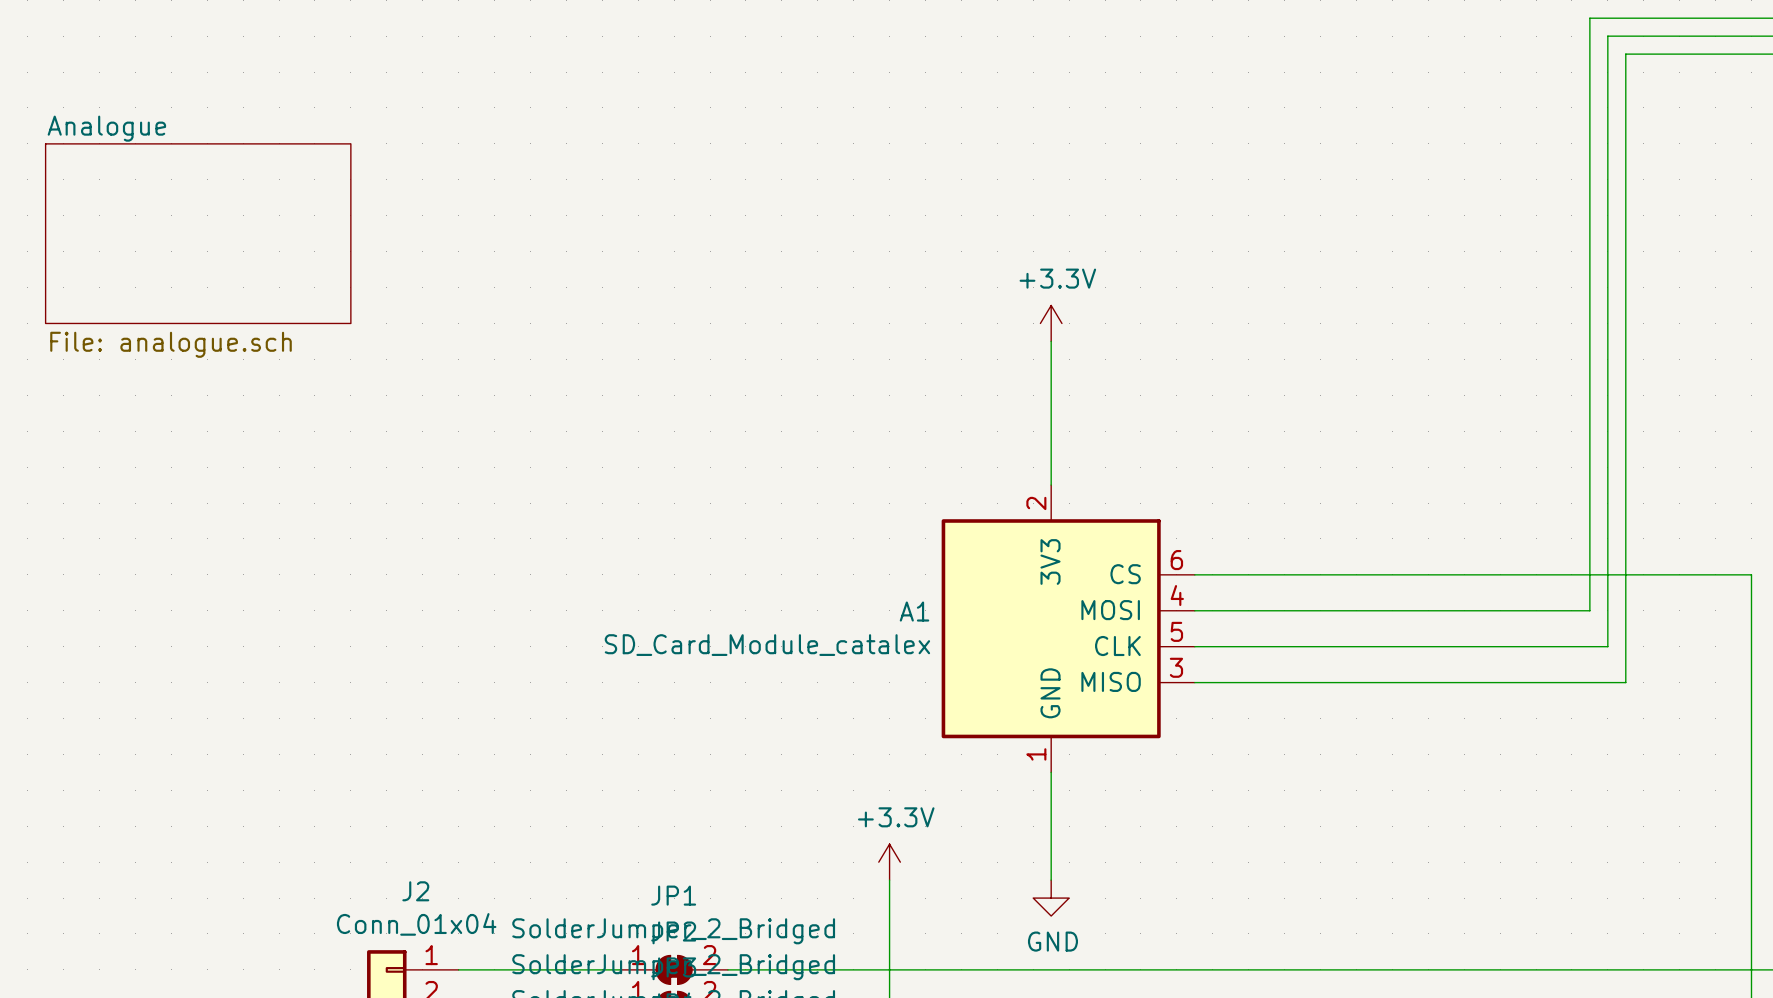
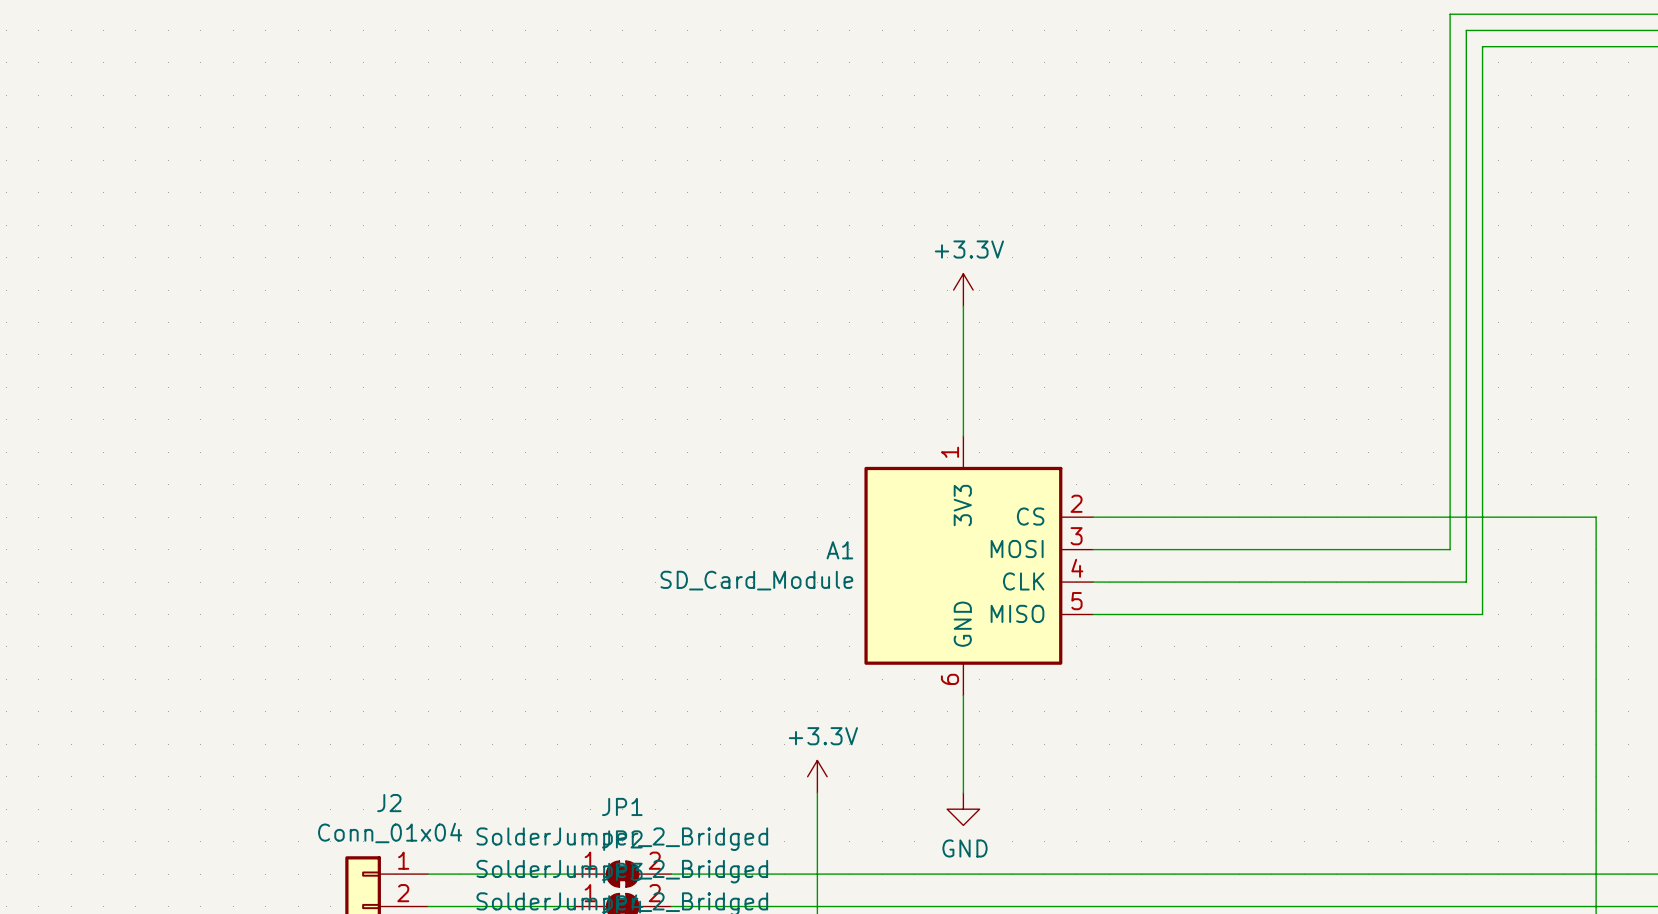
sheet Analogue: File: analogue.sch (198, 233) -> none
A1 pin number: 2 (1036, 503) -> 1 (950, 452)
A1 pin number: 6 (1176, 560) -> 2 (1076, 503)
A1 pin number: 4 (1177, 595) -> 3 (1076, 536)
A1 pin number: 5 (1176, 631) -> 4 (1077, 568)
A1 value: SD_Card_Module_catalex (767, 645) -> SD_Card_Module (756, 580)
A1 pin number: 3 (1176, 667) -> 5 (1076, 601)
A1 pin number: 1 (1036, 754) -> 6 (950, 679)

